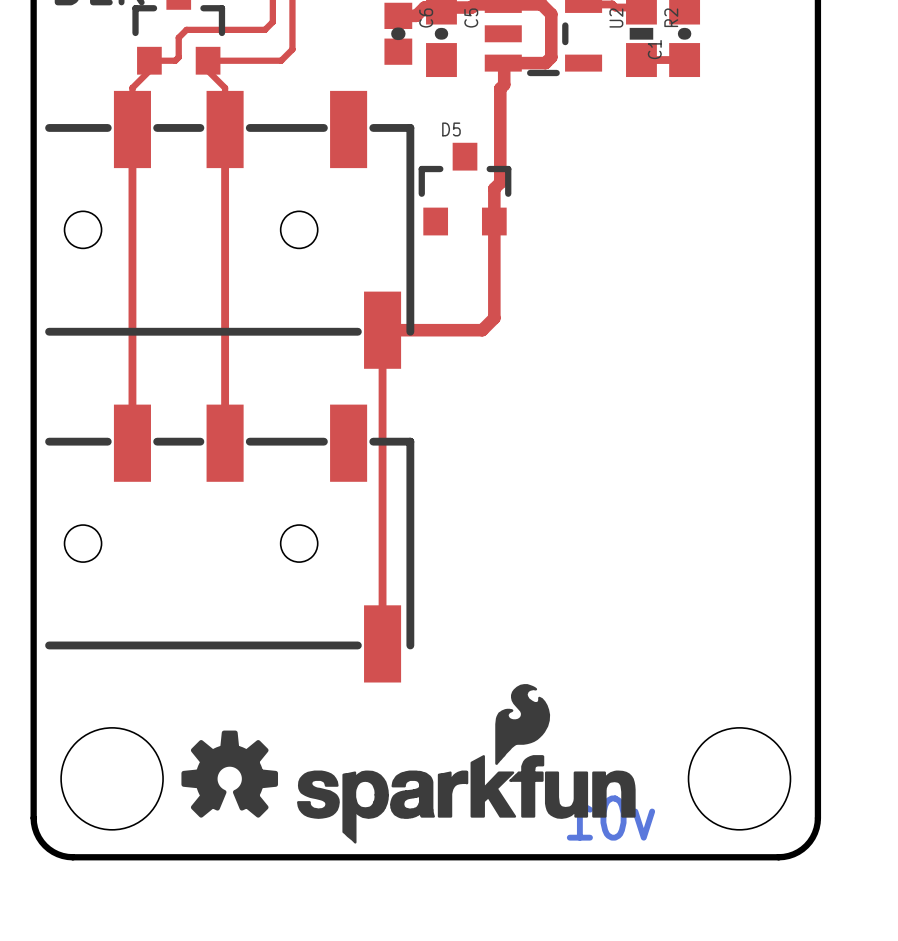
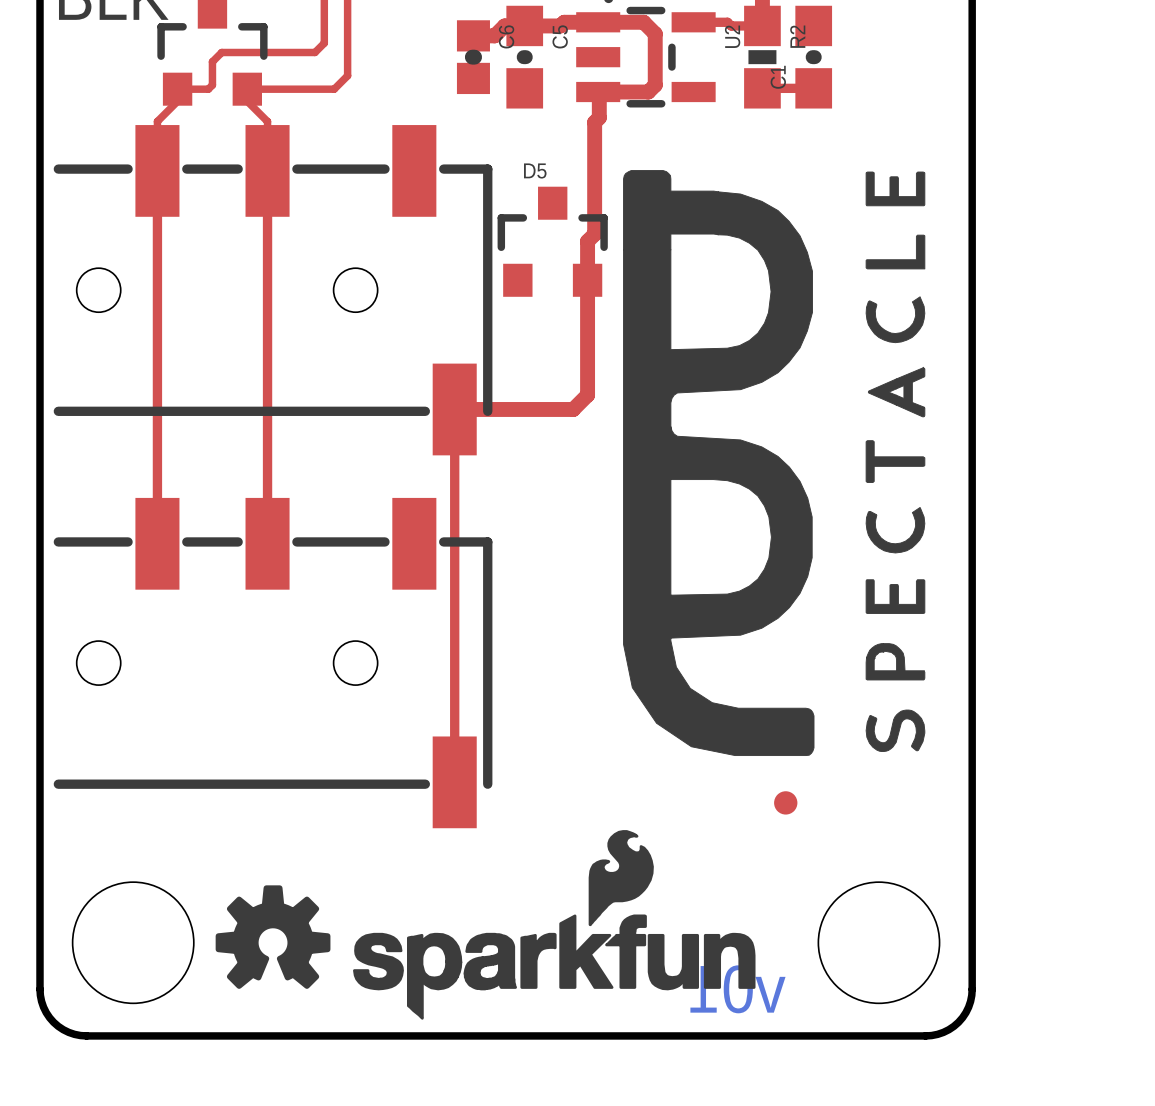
drawing: none -> [623, 170, 926, 757]
part: none -> (785, 802)

